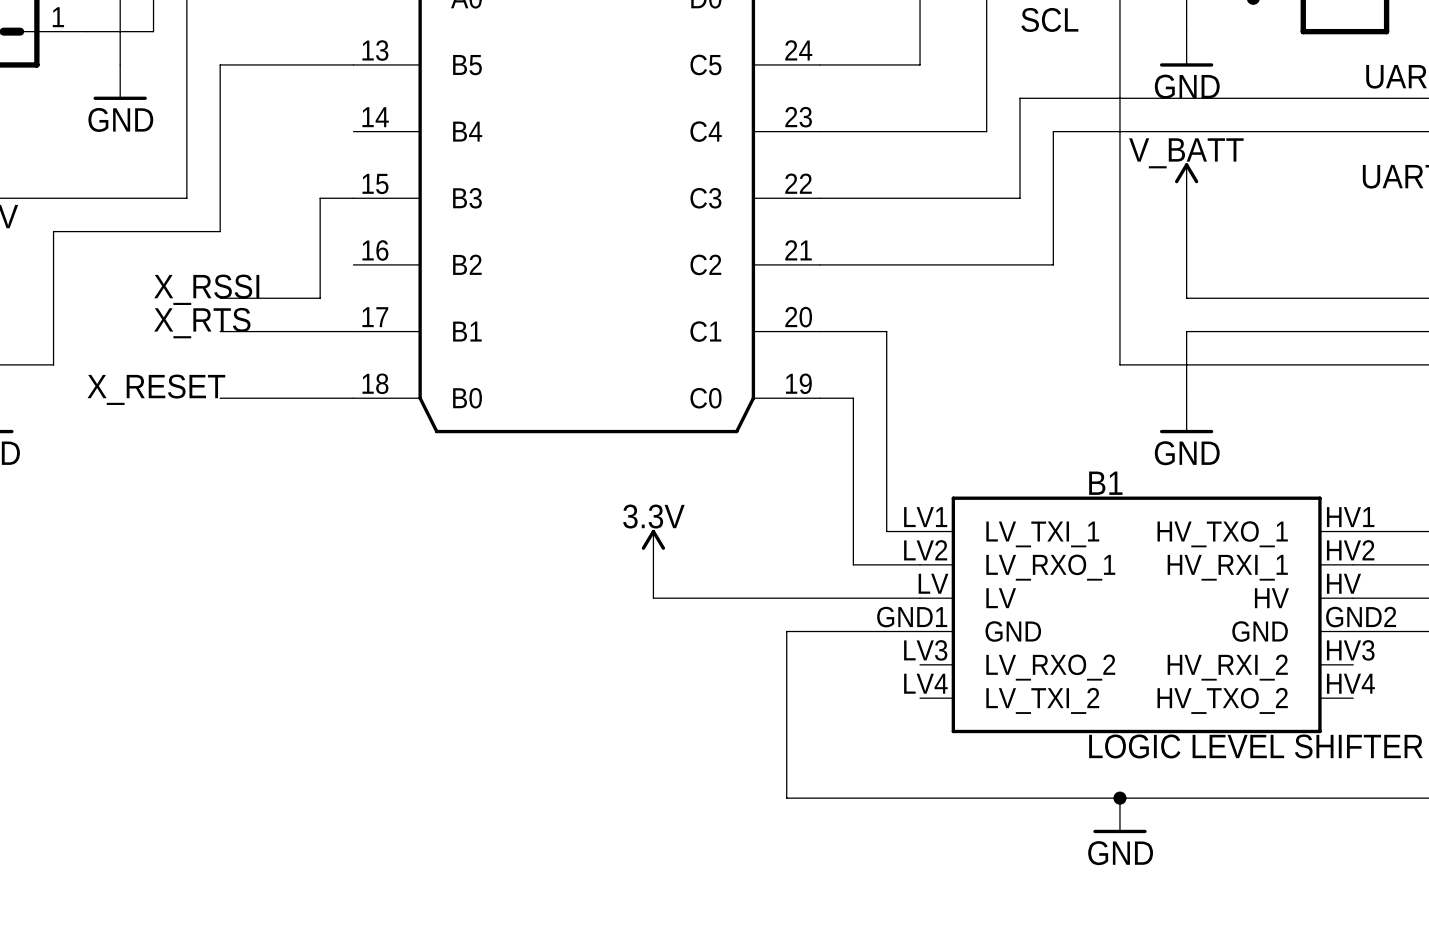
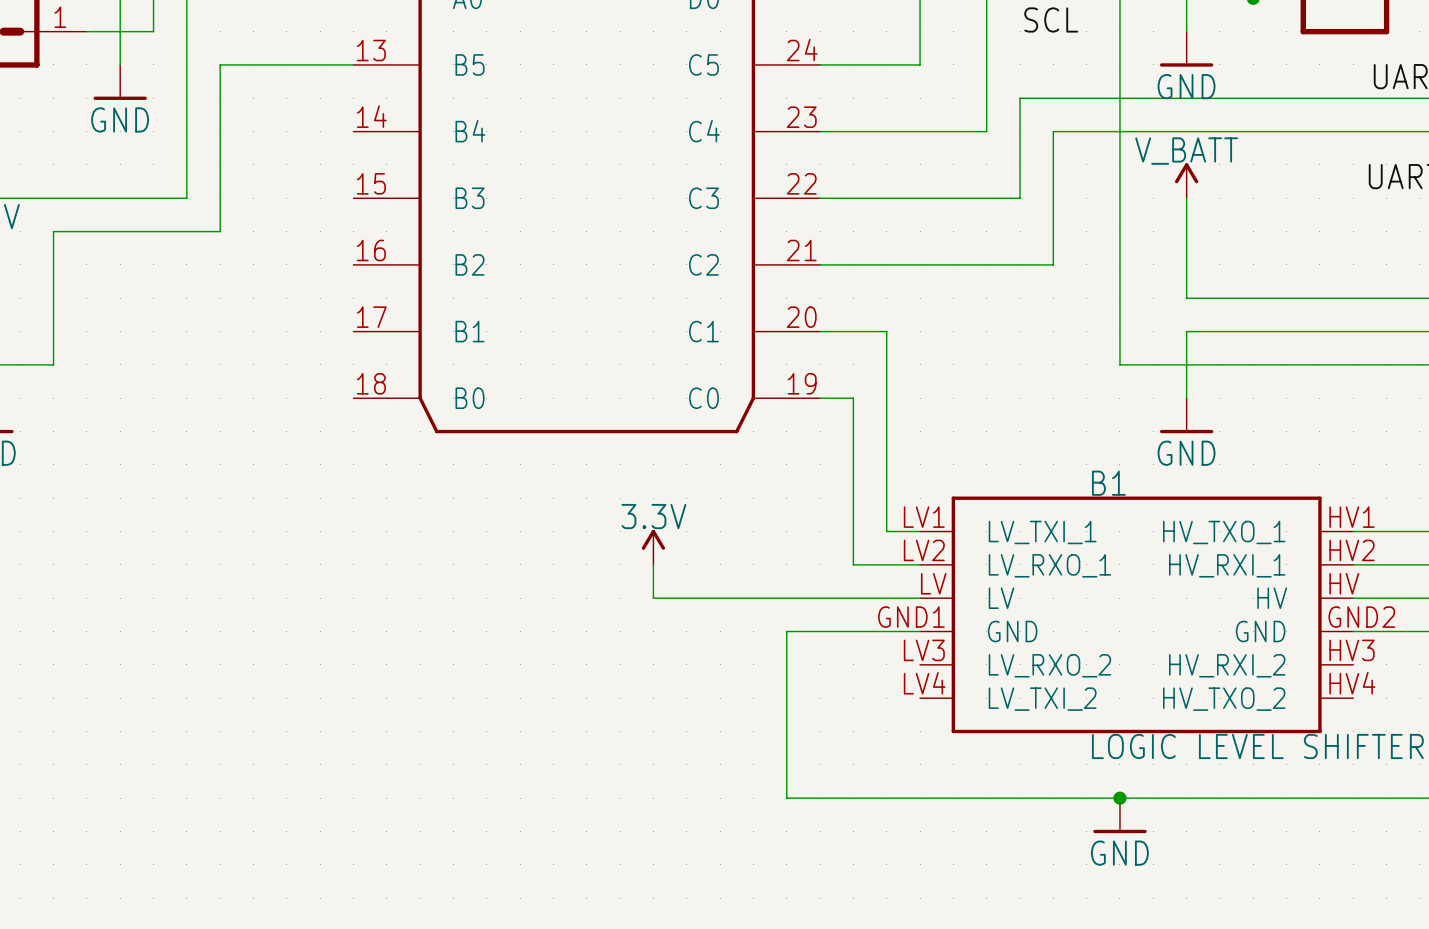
wire: (353, 198) (320, 198) (320, 298) (220, 298) -> none
label: X_RSSI (206, 289) -> none
label: X_RTS (202, 323) -> none
wire: (220, 331) (353, 331) -> none
label: X_RESET (156, 389) -> none
wire: (220, 398) (353, 398) -> none

